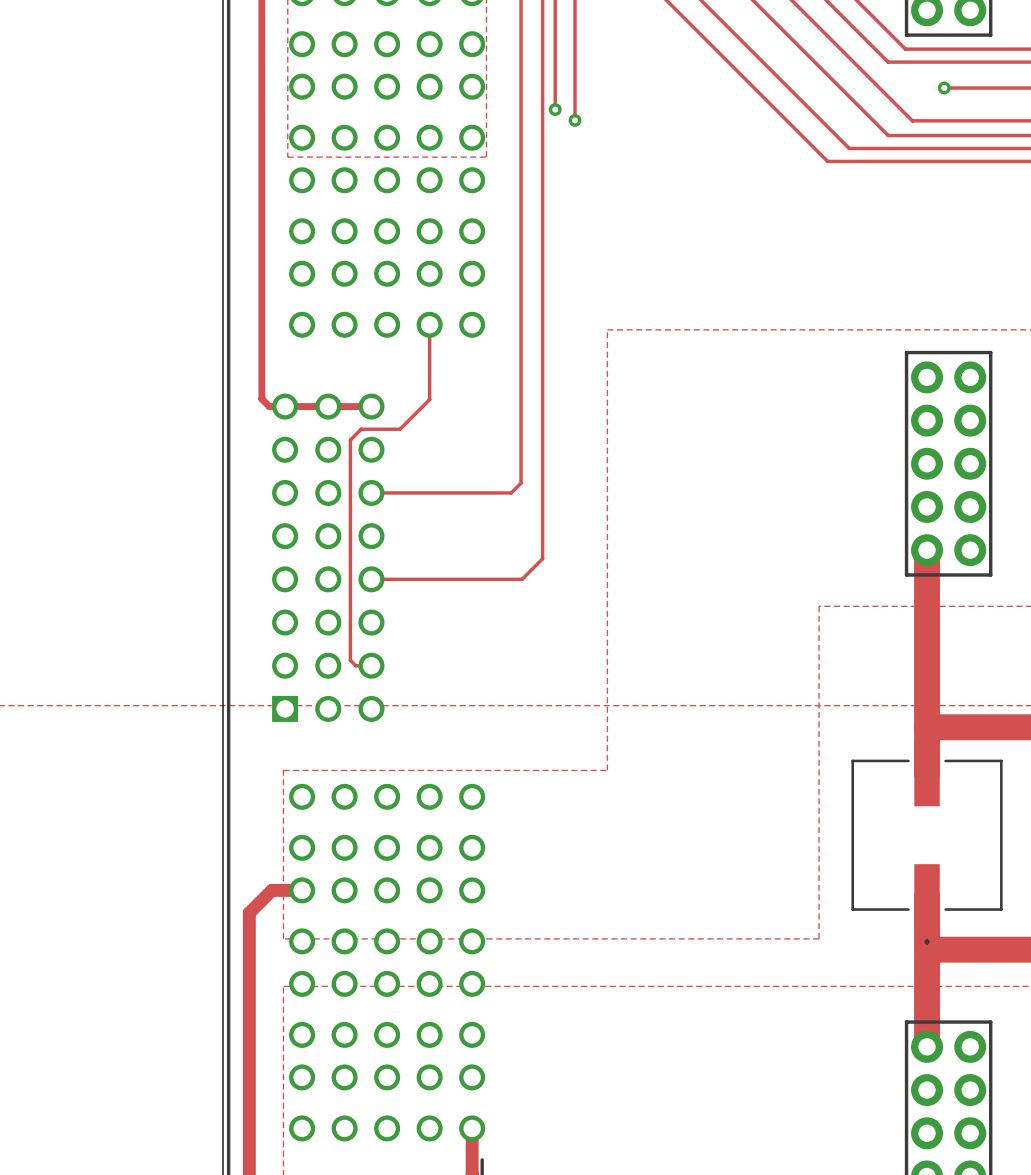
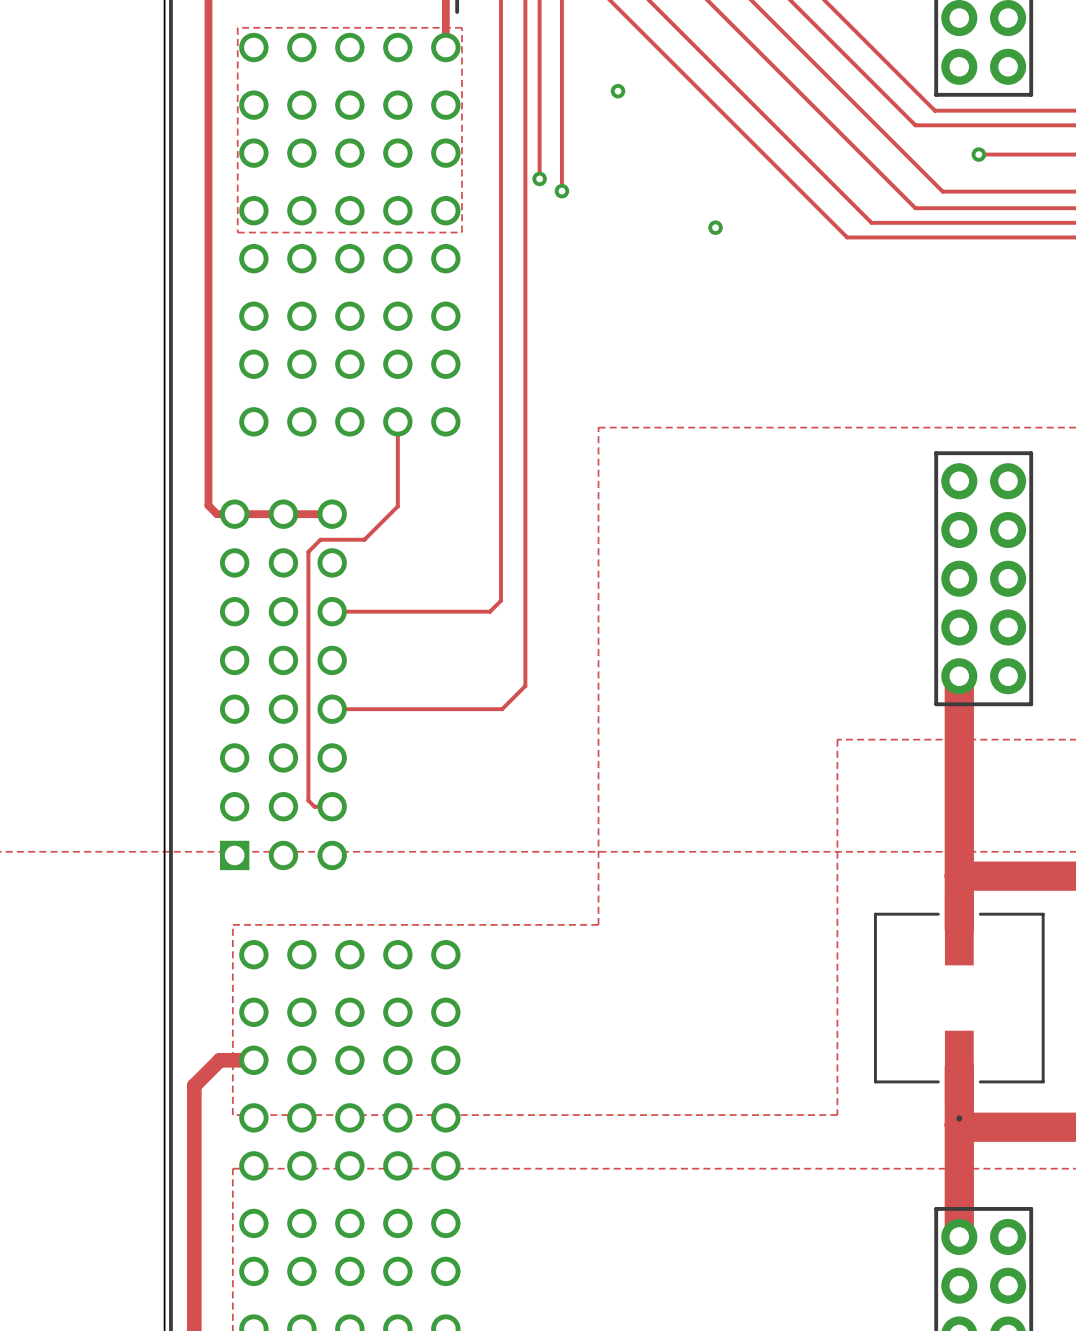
via: none -> (618, 91)
via: none -> (715, 227)

